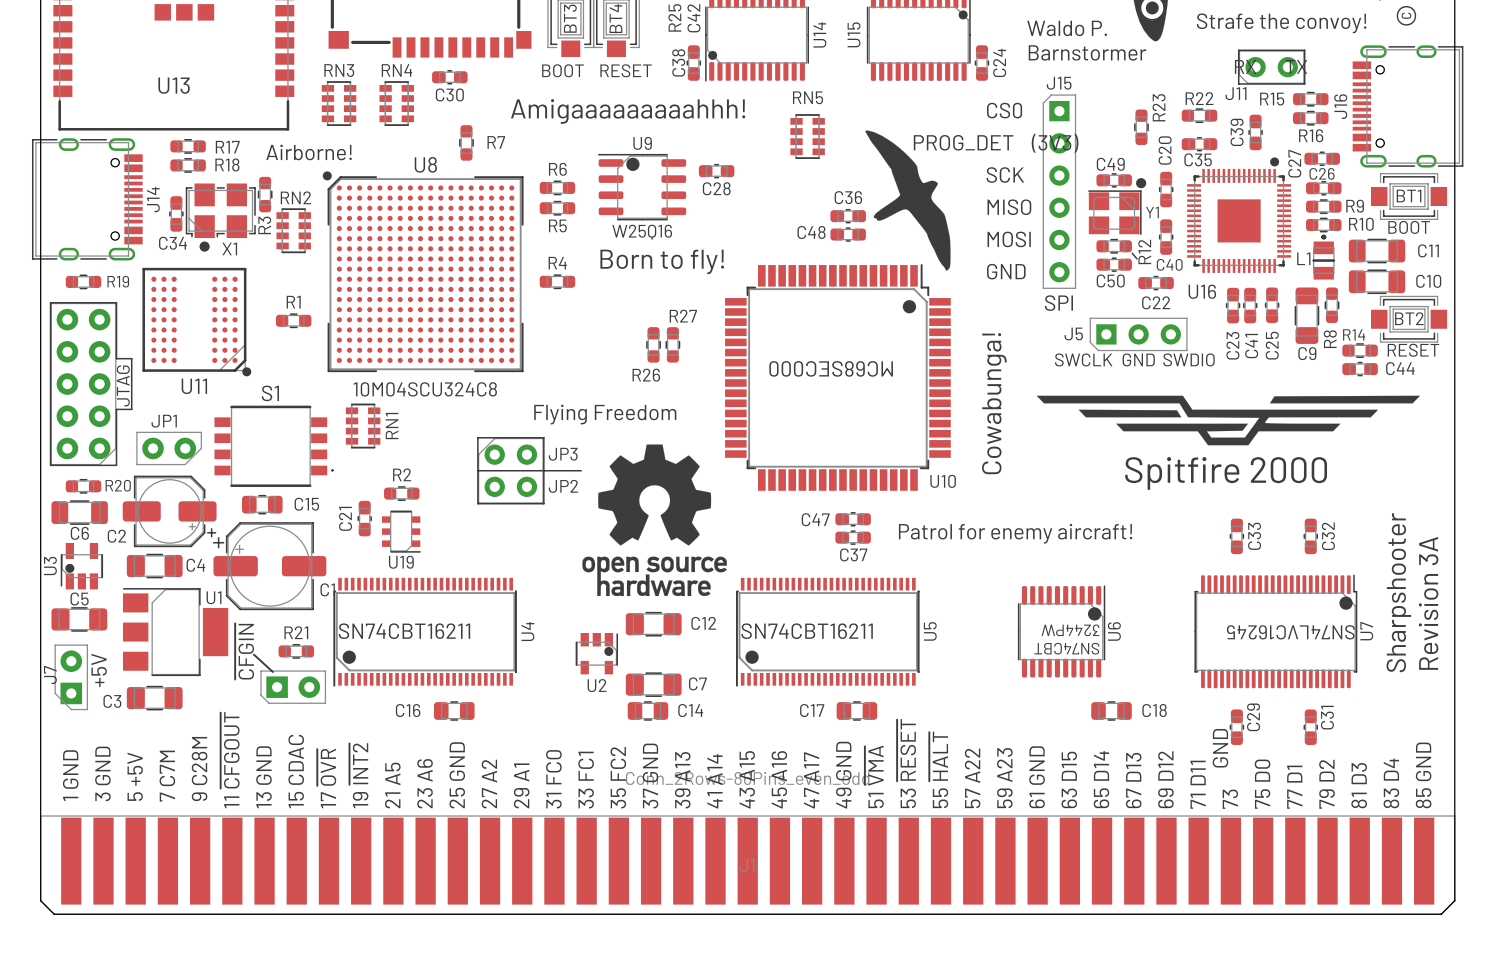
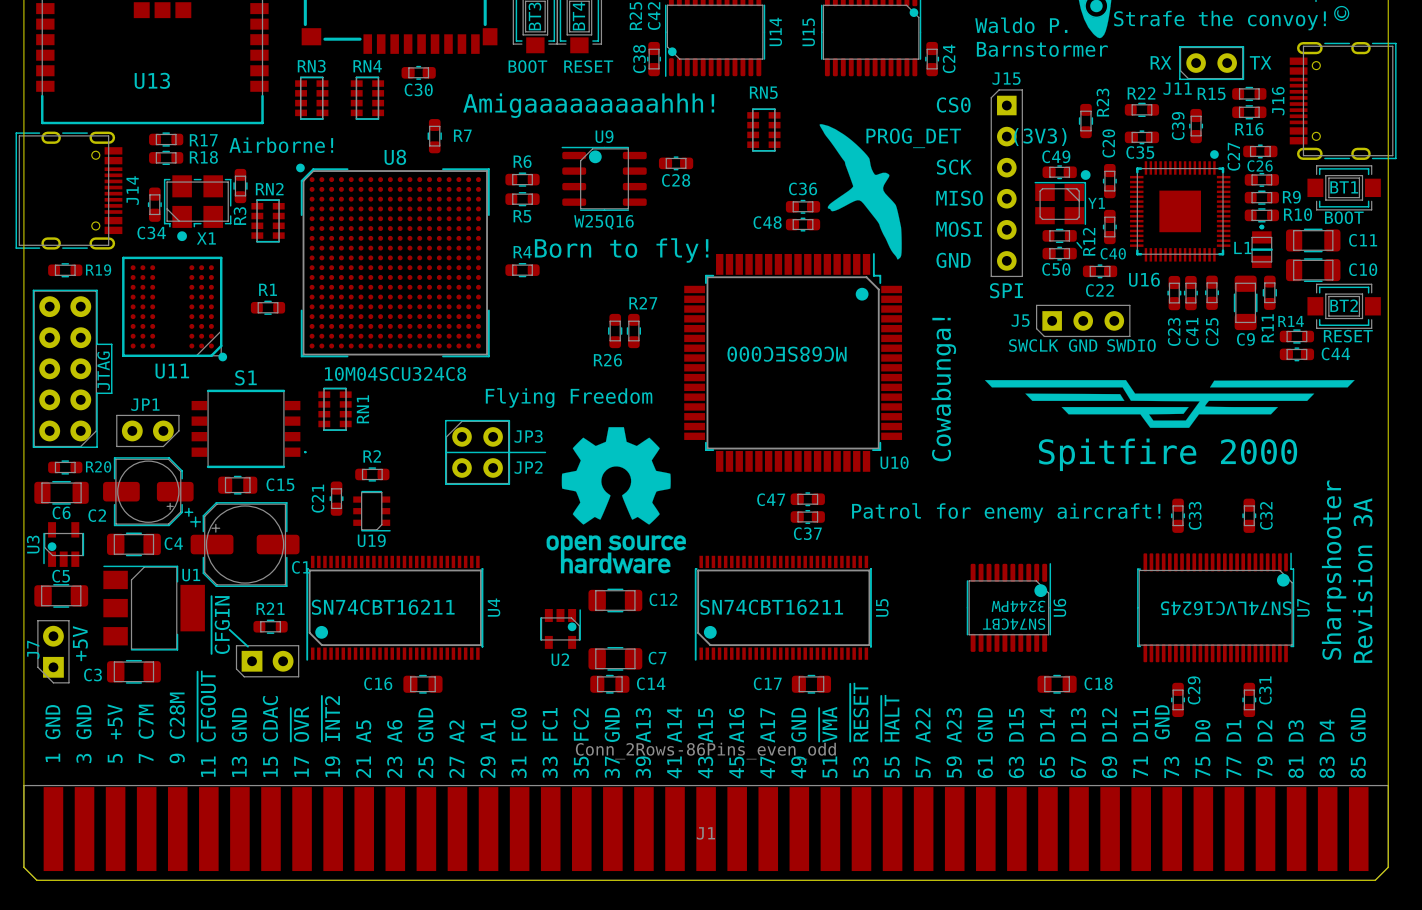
R8 name: R8 (1330, 339) -> R11 (1267, 328)

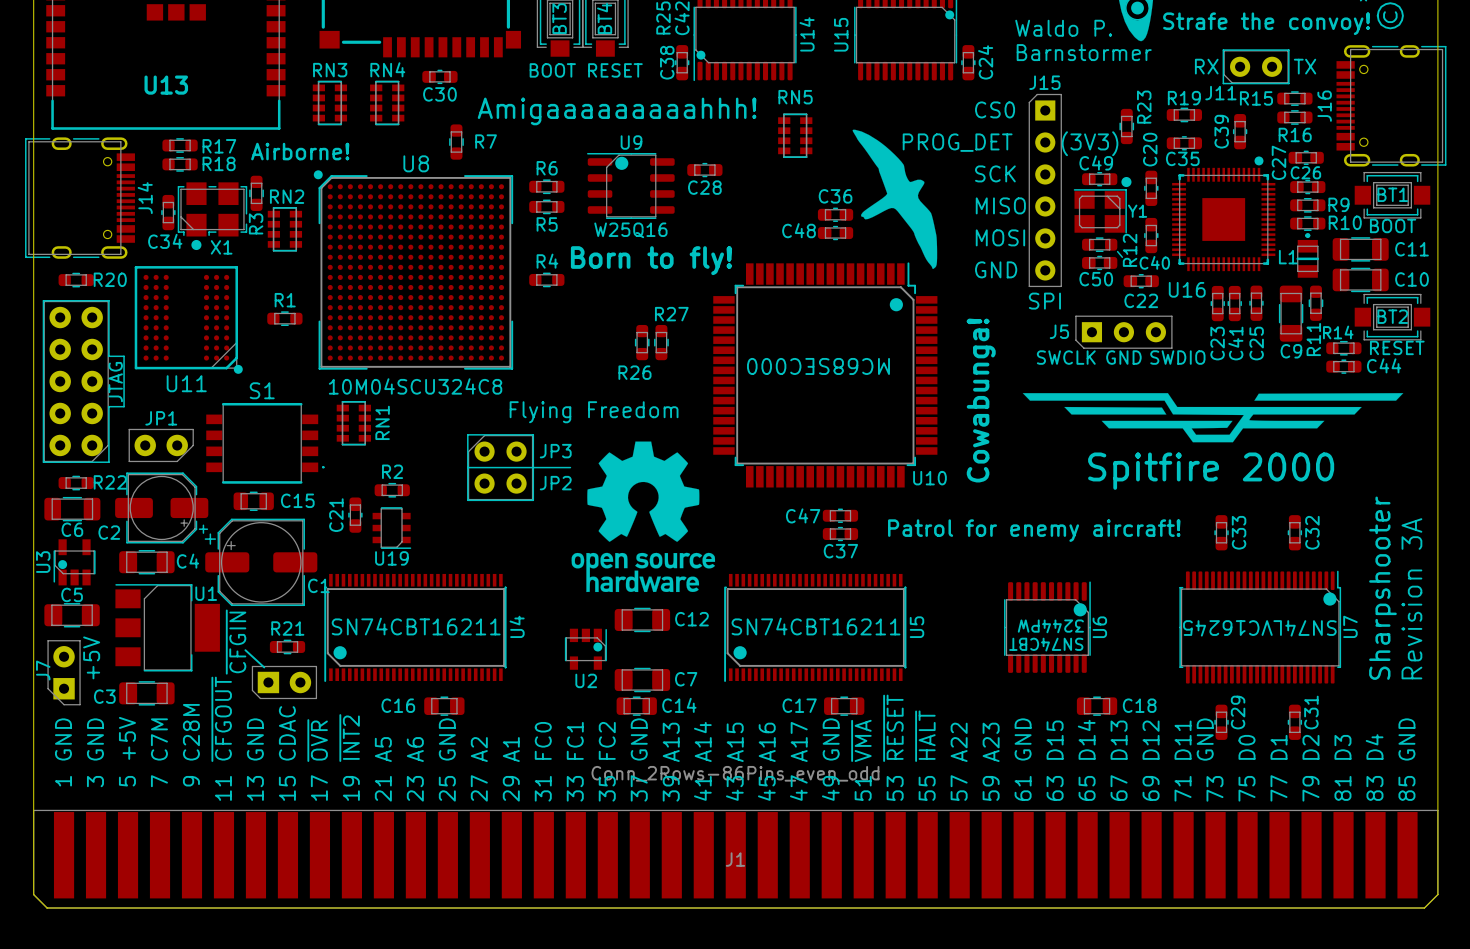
R22 name: R22 (1141, 93) -> R19 (1184, 98)
R19 name: R19 (98, 270) -> R20 (110, 279)
R20 name: R20 (98, 466) -> R22 (110, 482)

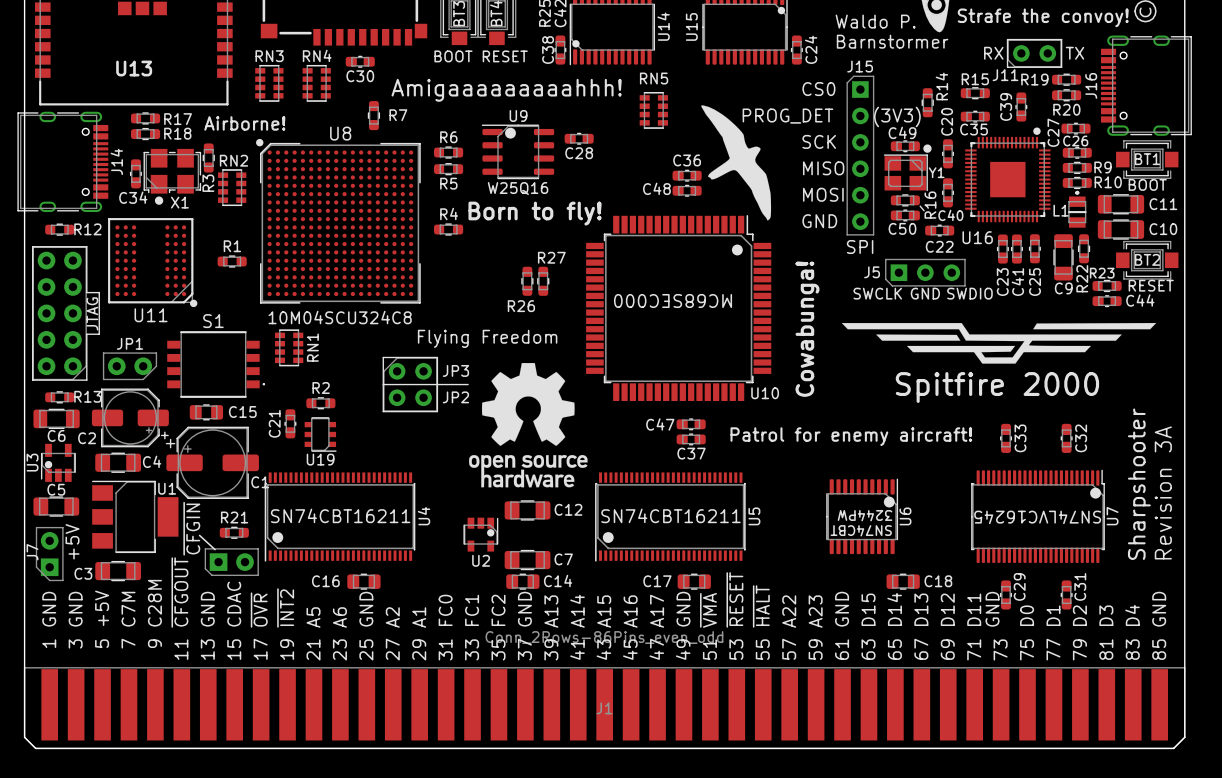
R19 name: R19 (1184, 98) -> R15 (975, 79)
R15 name: R15 (1256, 98) -> R19 (1034, 79)
R23 name: R23 (1144, 107) -> R14 (941, 86)
R16 name: R16 (1295, 134) -> R20 (1066, 109)
R12 name: R12 (1130, 250) -> R16 (930, 205)
R20 name: R20 (110, 279) -> R12 (87, 229)
R14 name: R14 (1338, 332) -> R23 (1102, 273)
R11 name: R11 (1313, 339) -> R22 (1082, 278)
R22 name: R22 (110, 482) -> R13 (87, 396)

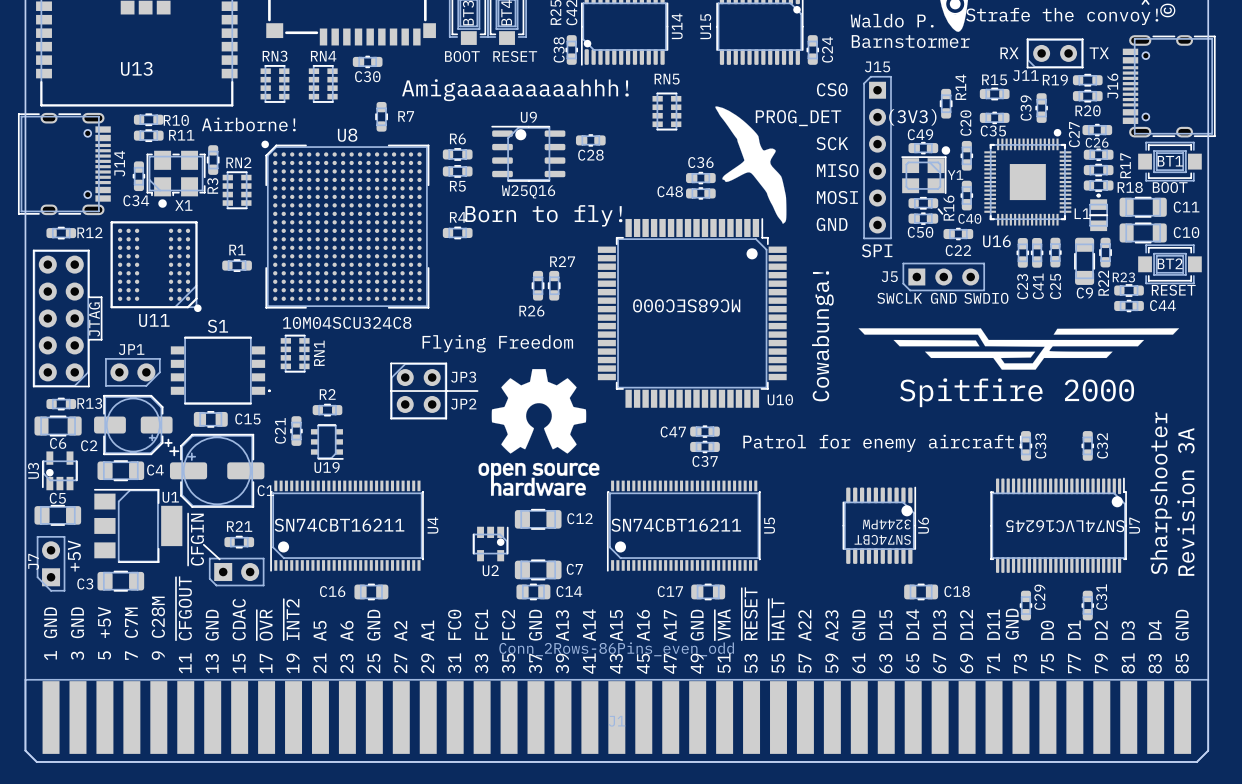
R17 name: R17 (178, 119) -> R10 (176, 120)
R18 name: R18 (177, 133) -> R11 (181, 135)
R9 name: R9 (1103, 167) -> R17 (1125, 165)
R10 name: R10 (1108, 182) -> R18 (1130, 187)

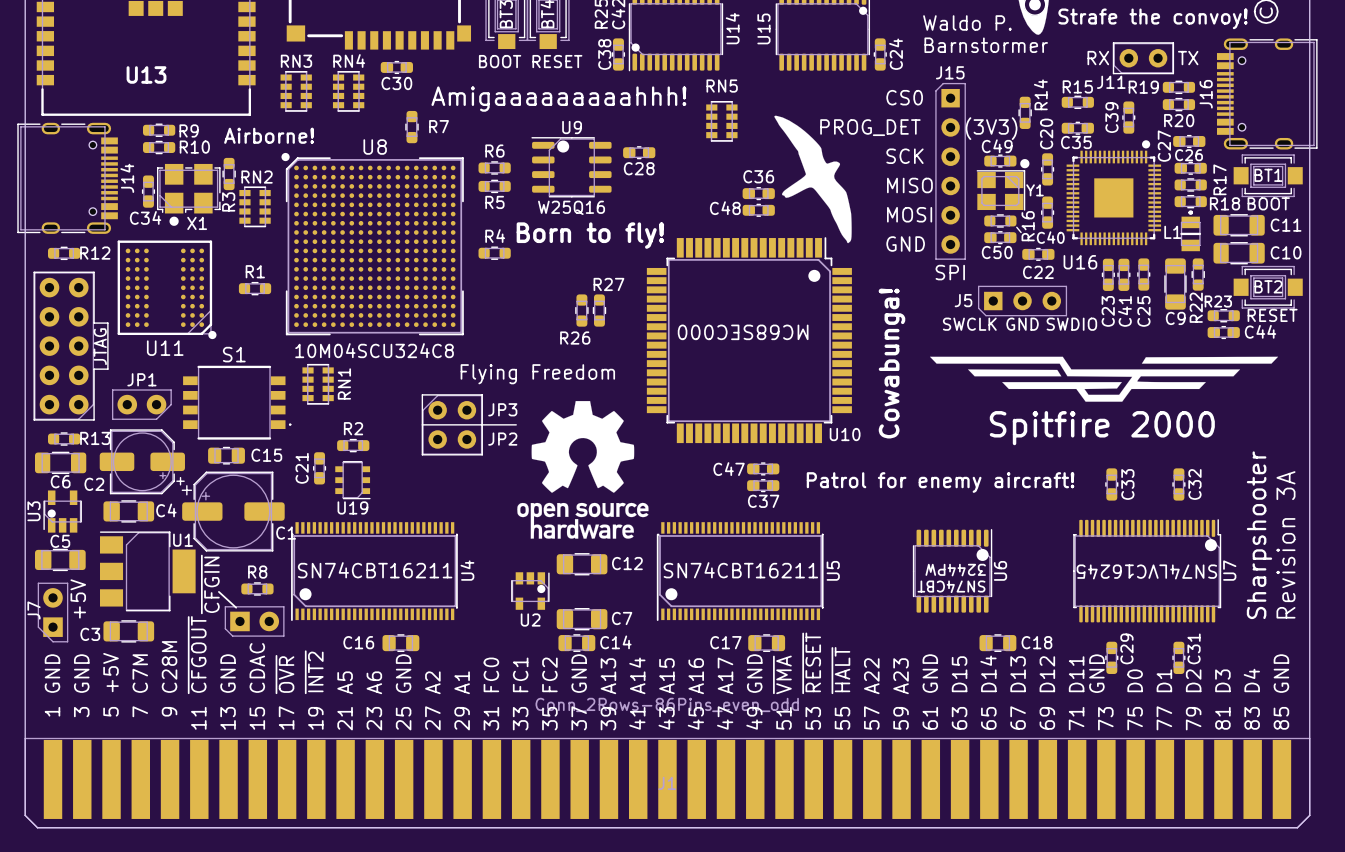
R10 name: R10 (176, 120) -> R9 (189, 130)
R11 name: R11 (181, 135) -> R10 (194, 147)
R21 name: R21 (239, 526) -> R8 (257, 572)

